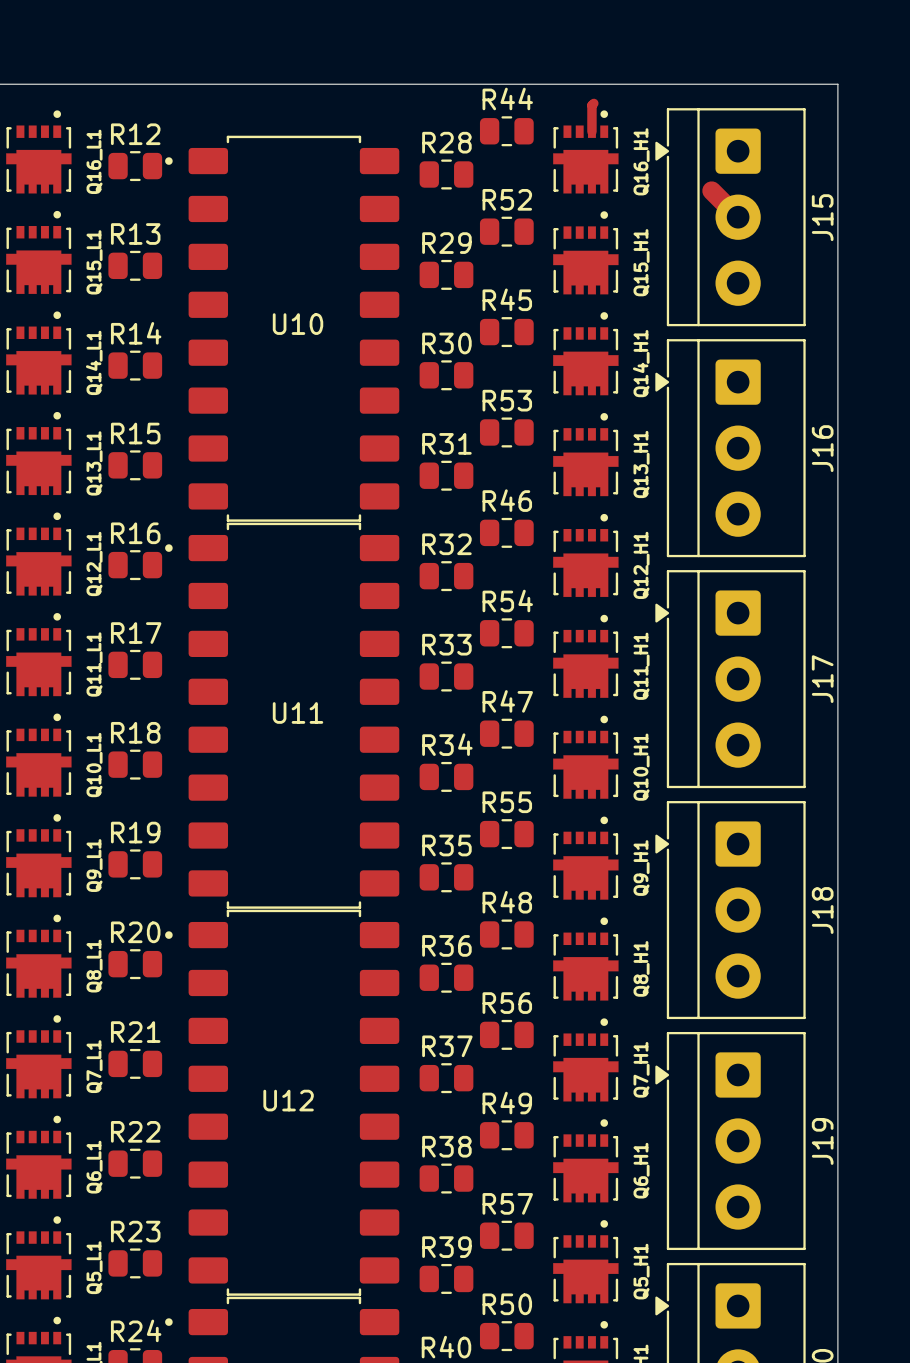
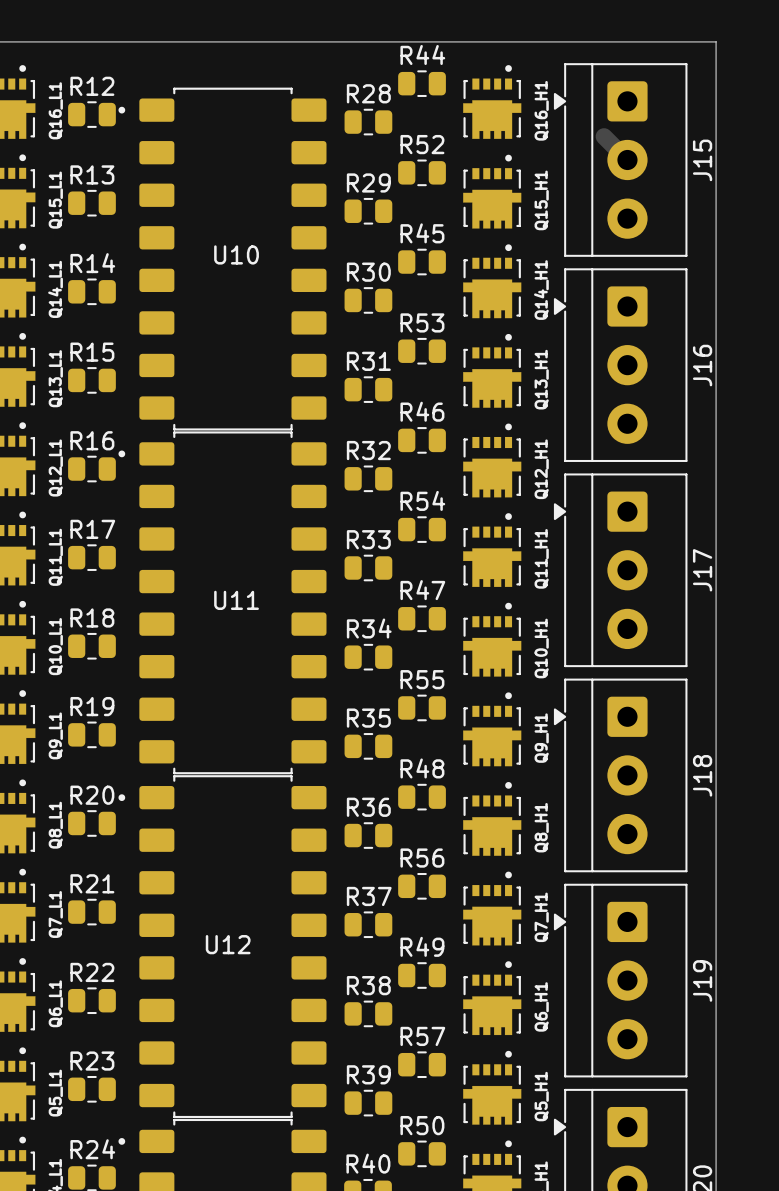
track: (593, 103) (591, 105) (591, 131) -> none

